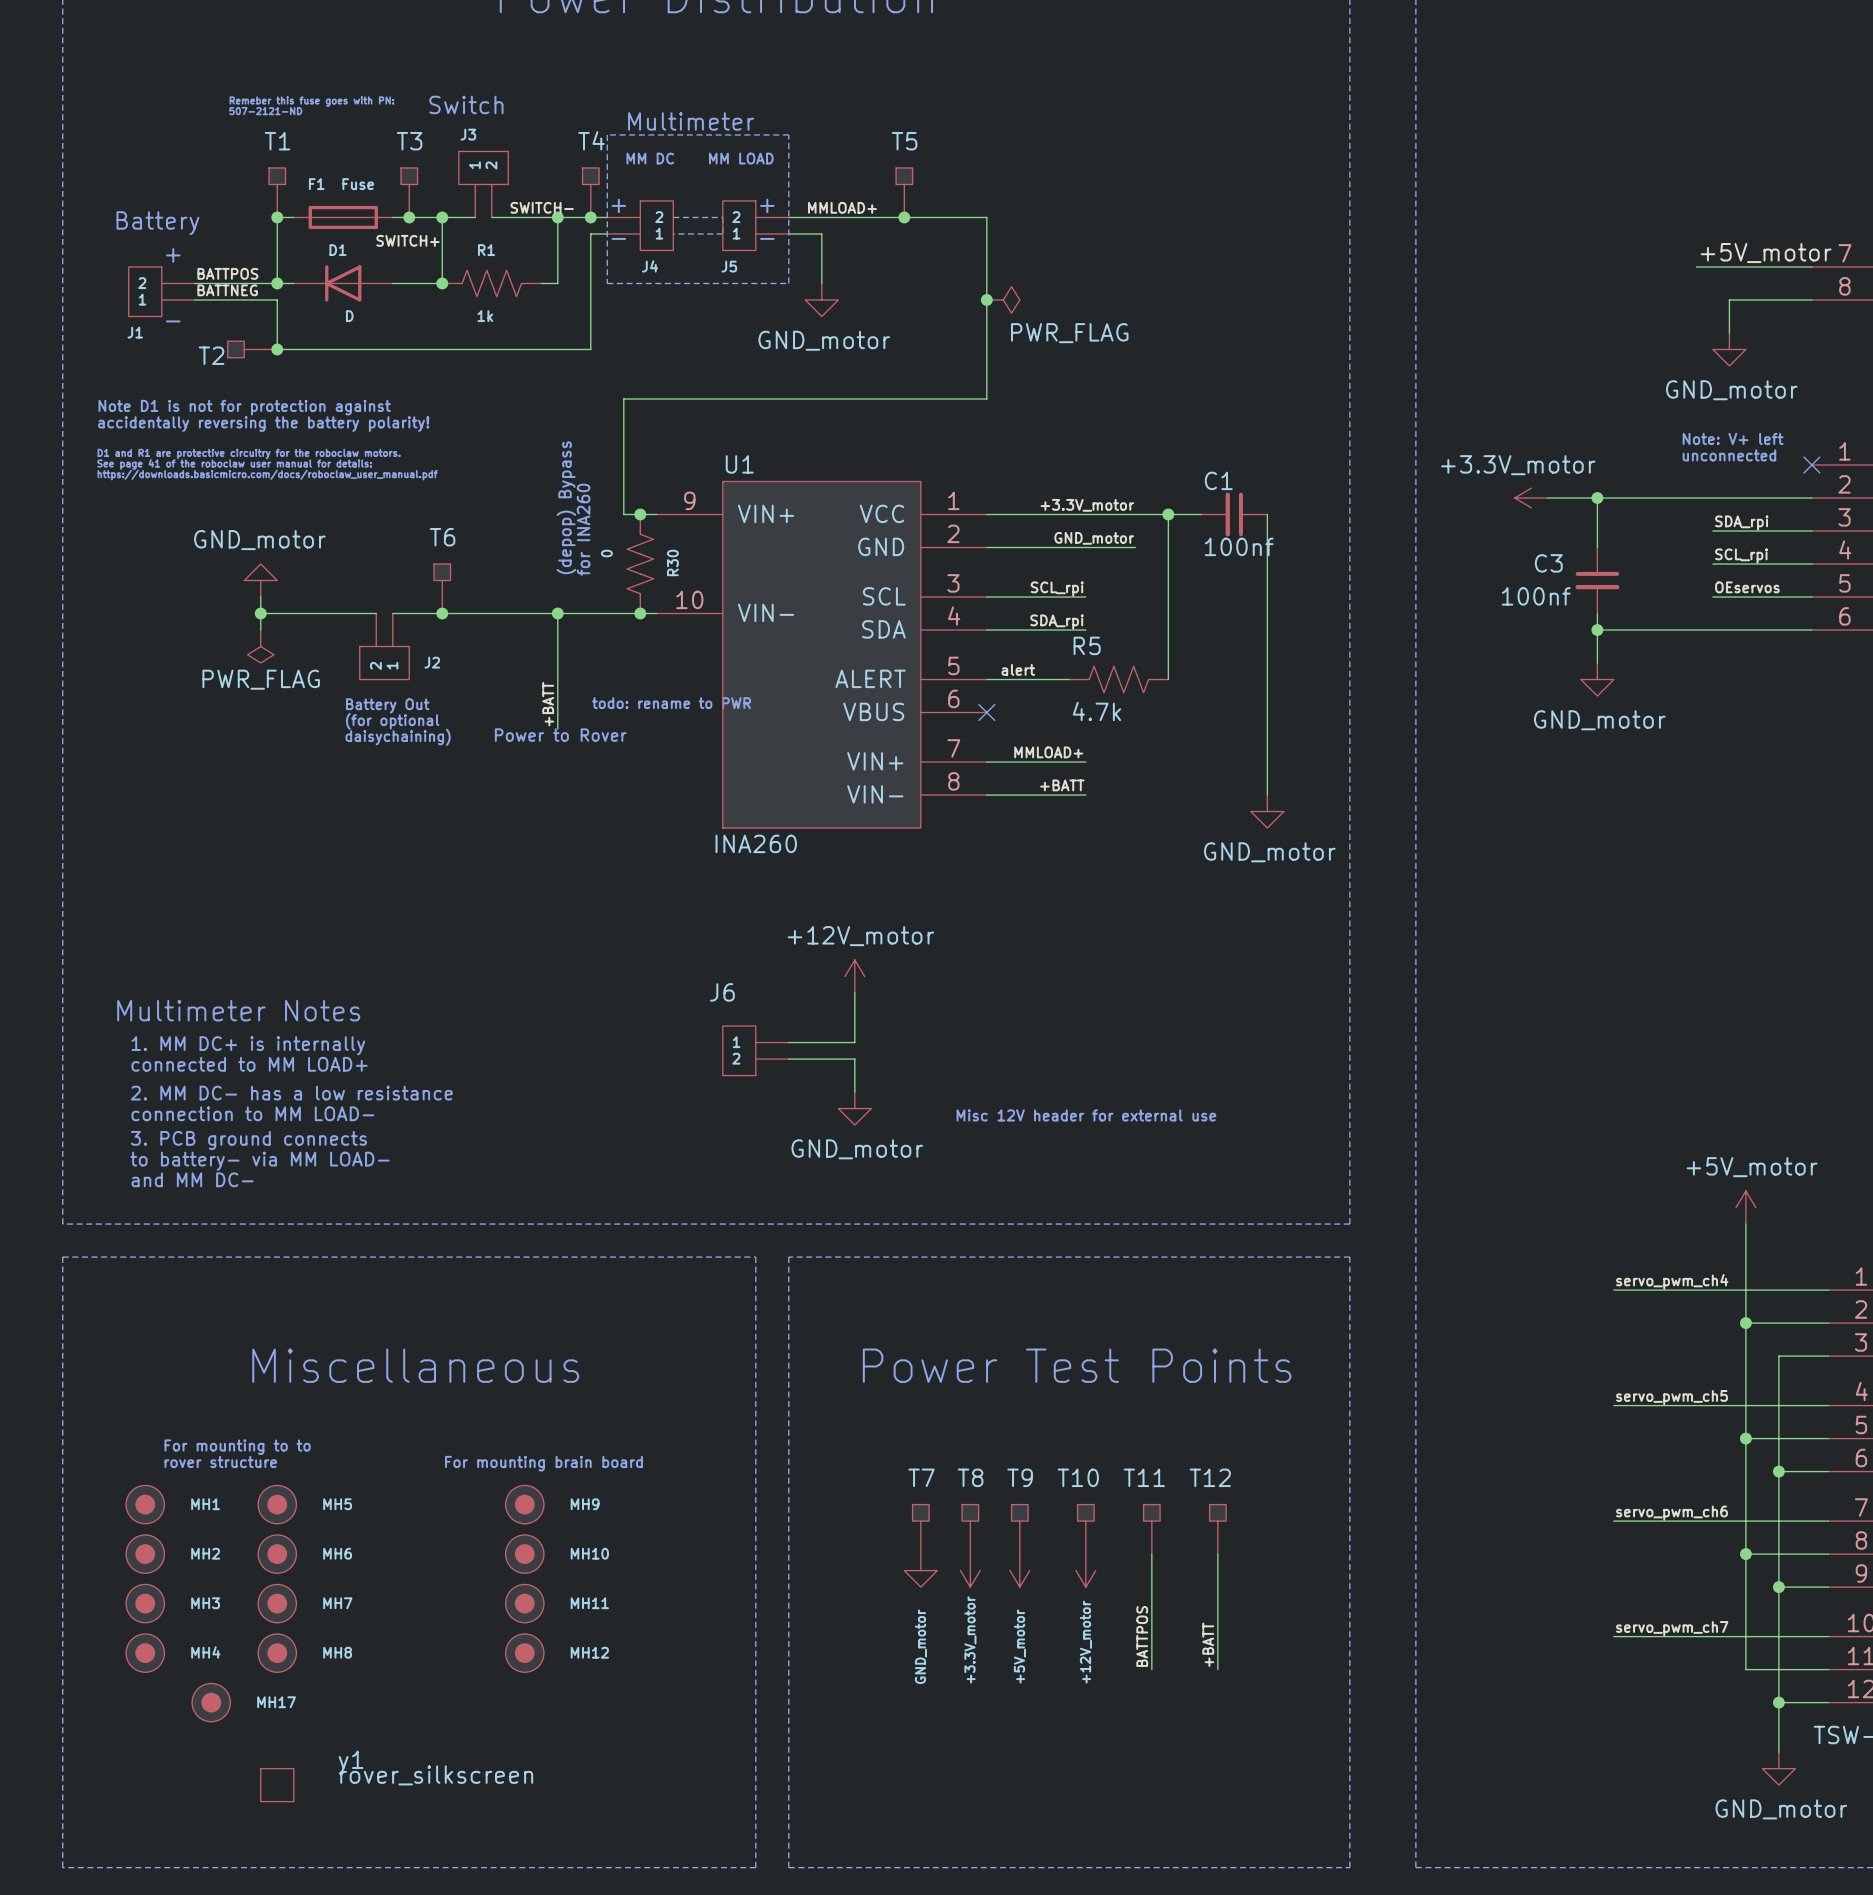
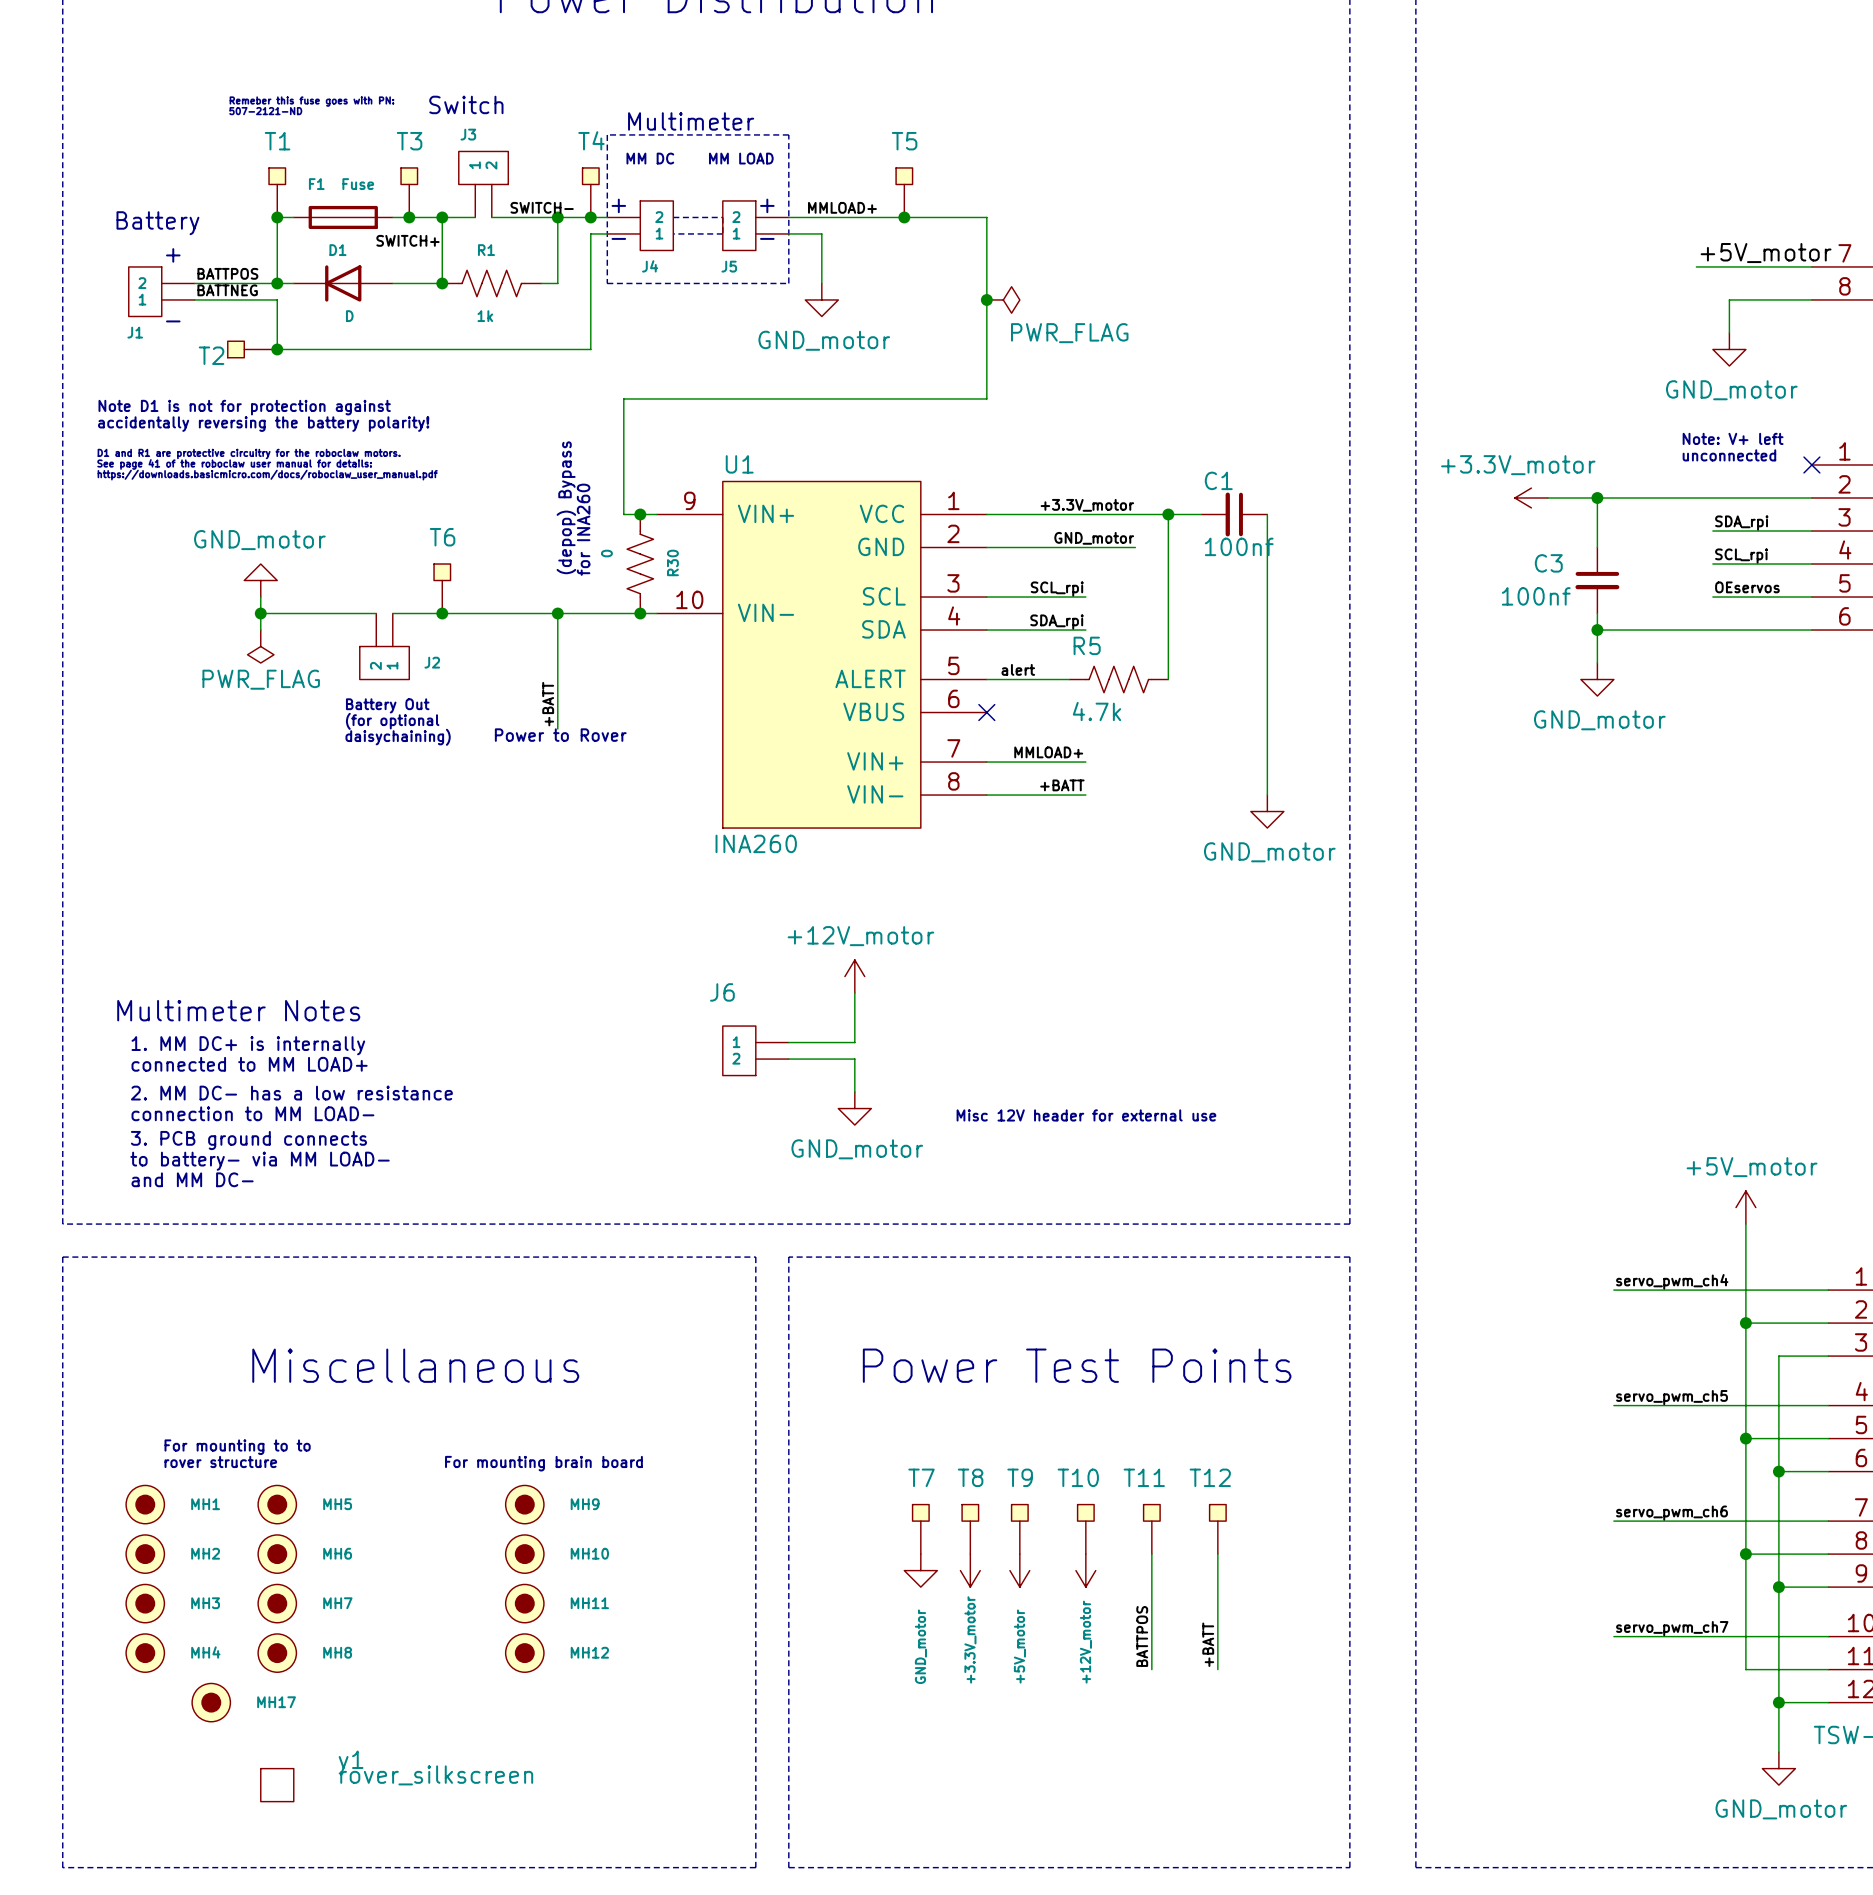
text: todo: rename to PWR (671, 703) -> none

